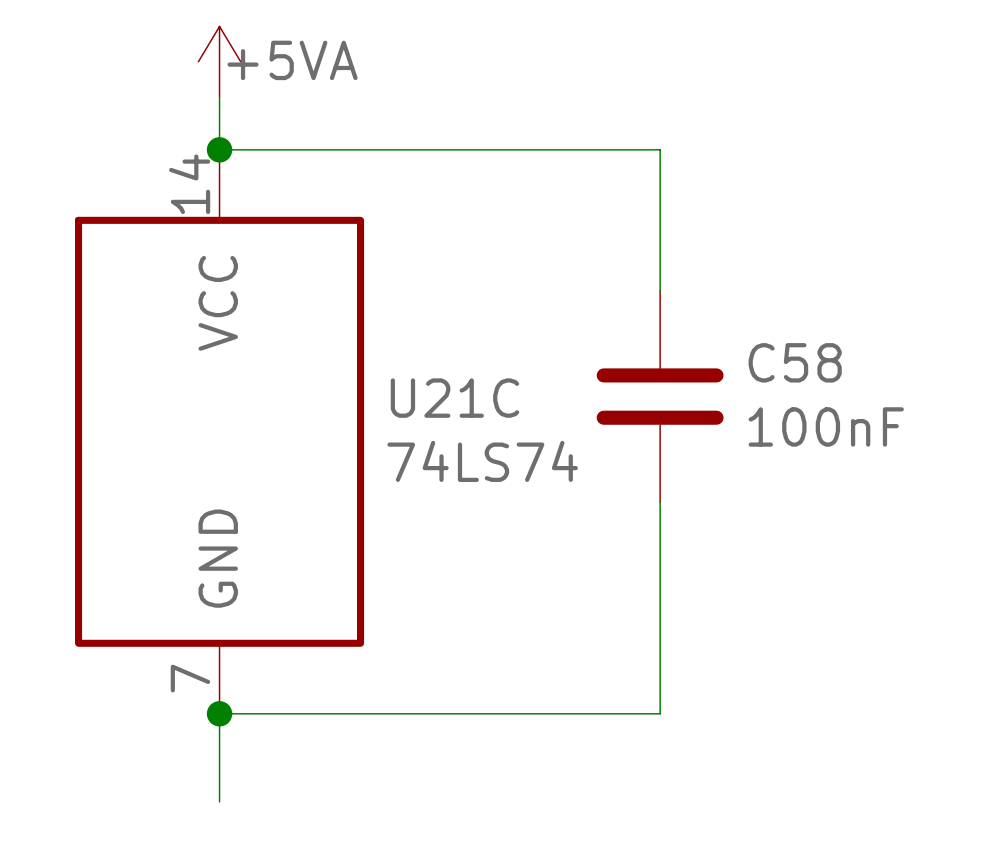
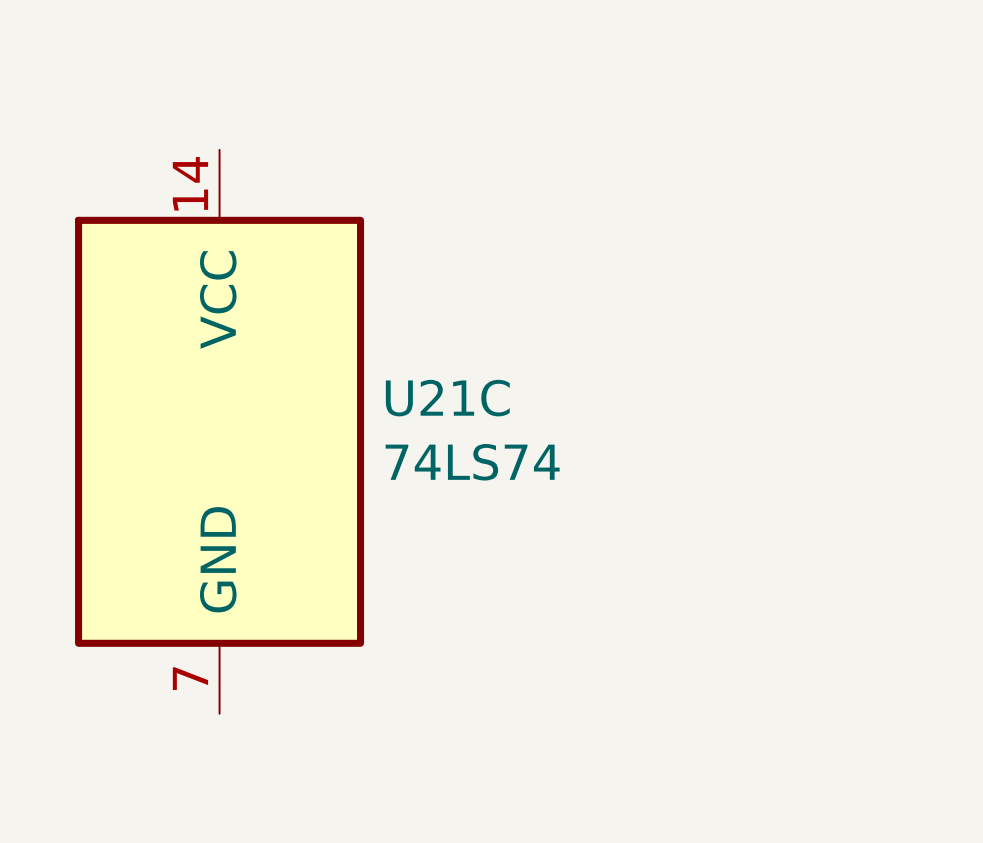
power symbol: +5VA (219, 61) -> none
wire: (219, 96) (219, 149) (660, 149) (660, 290) -> none
junction: (219, 149) -> none
C58: 100nF (660, 396) -> none
wire: (660, 502) (660, 713) (219, 713) (219, 801) -> none
junction: (219, 713) -> none

